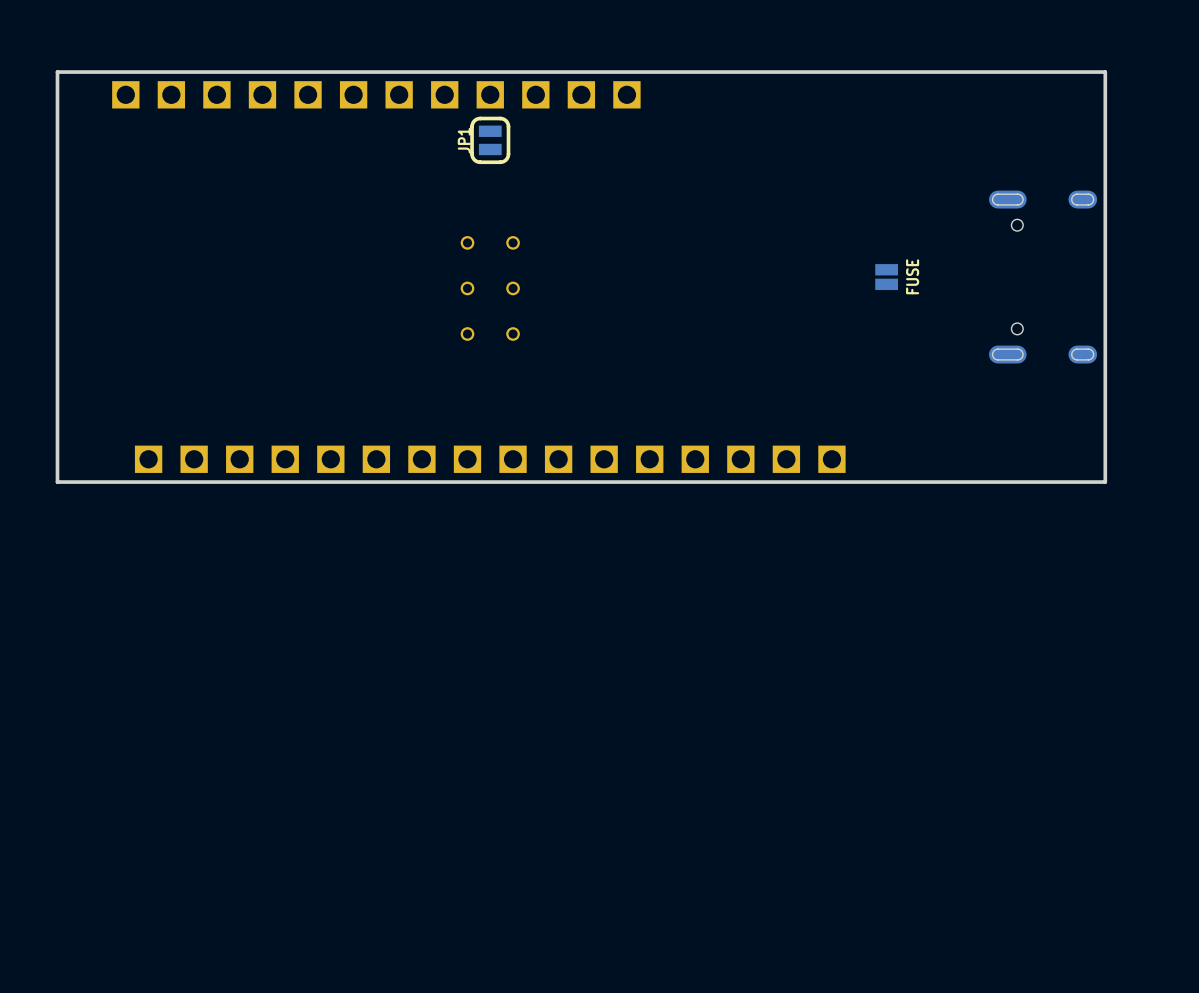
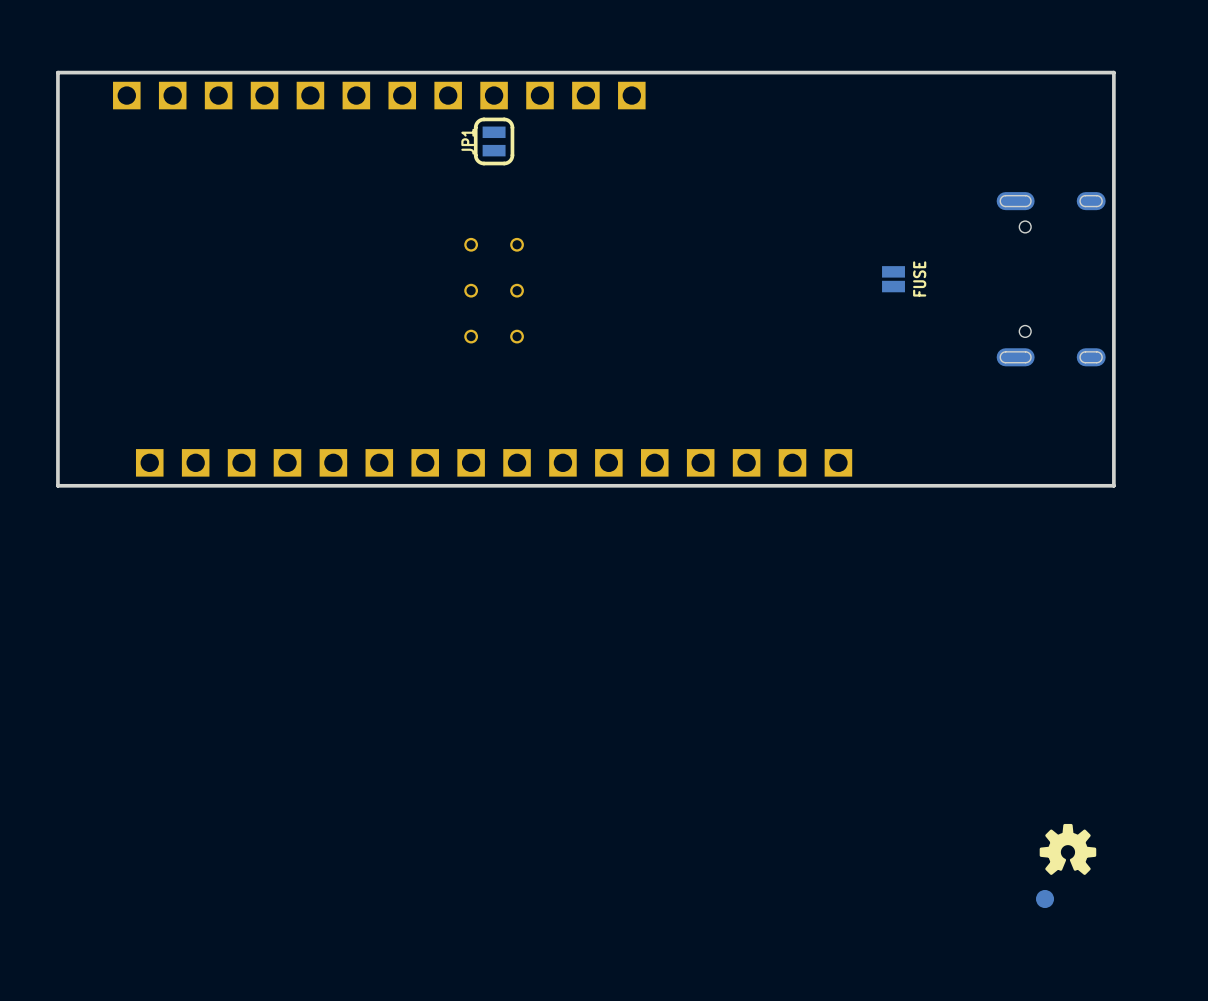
drawing: none -> [1039, 823, 1097, 875]
part: none -> (1045, 899)

